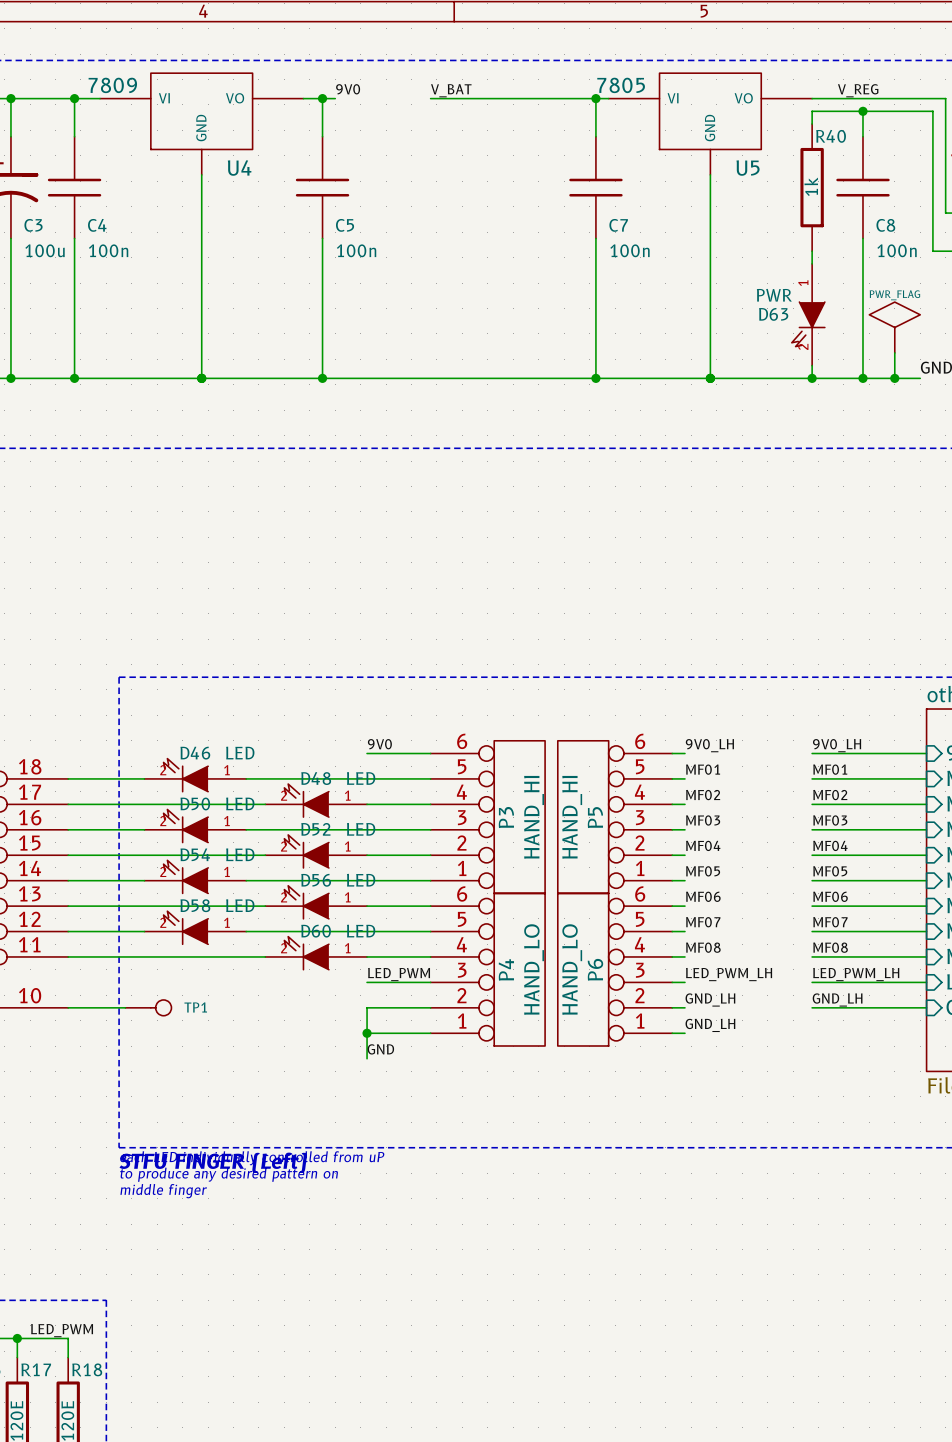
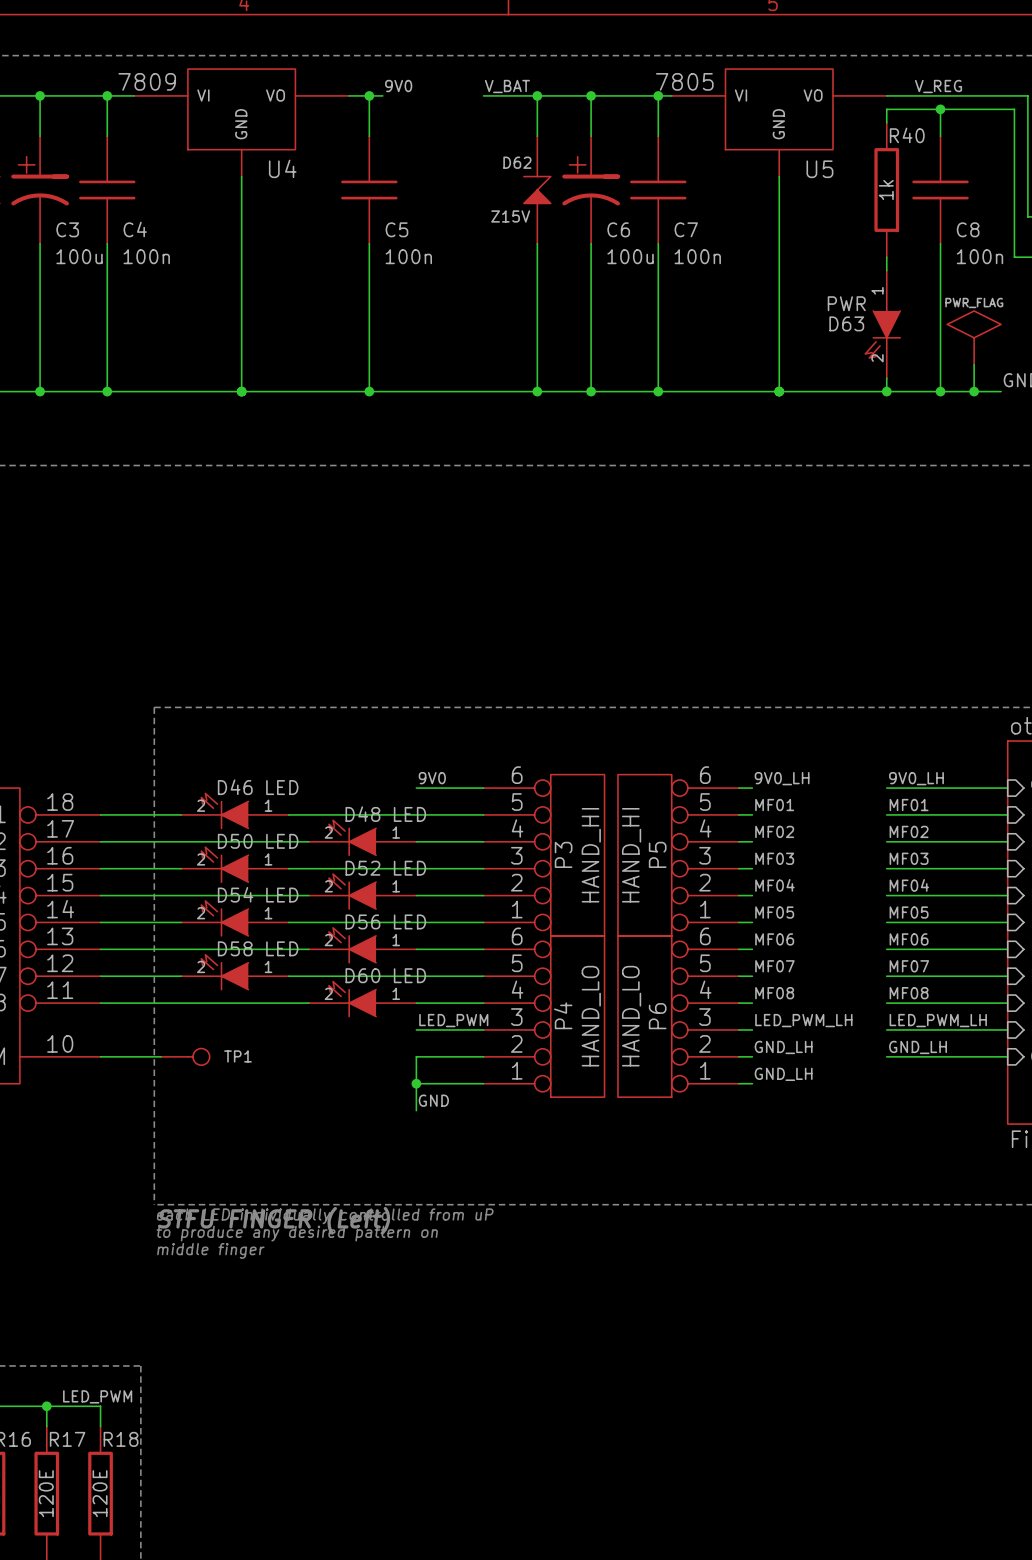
wire: none -> (537, 95) (537, 136)
junction: none -> (537, 95)
wire: none -> (591, 95) (591, 136)
junction: none -> (591, 95)
D62: none -> Z15V (537, 190)
C6: none -> 100u (591, 190)
wire: none -> (537, 243) (537, 391)
wire: none -> (591, 243) (591, 391)
junction: none -> (537, 391)
junction: none -> (591, 391)

